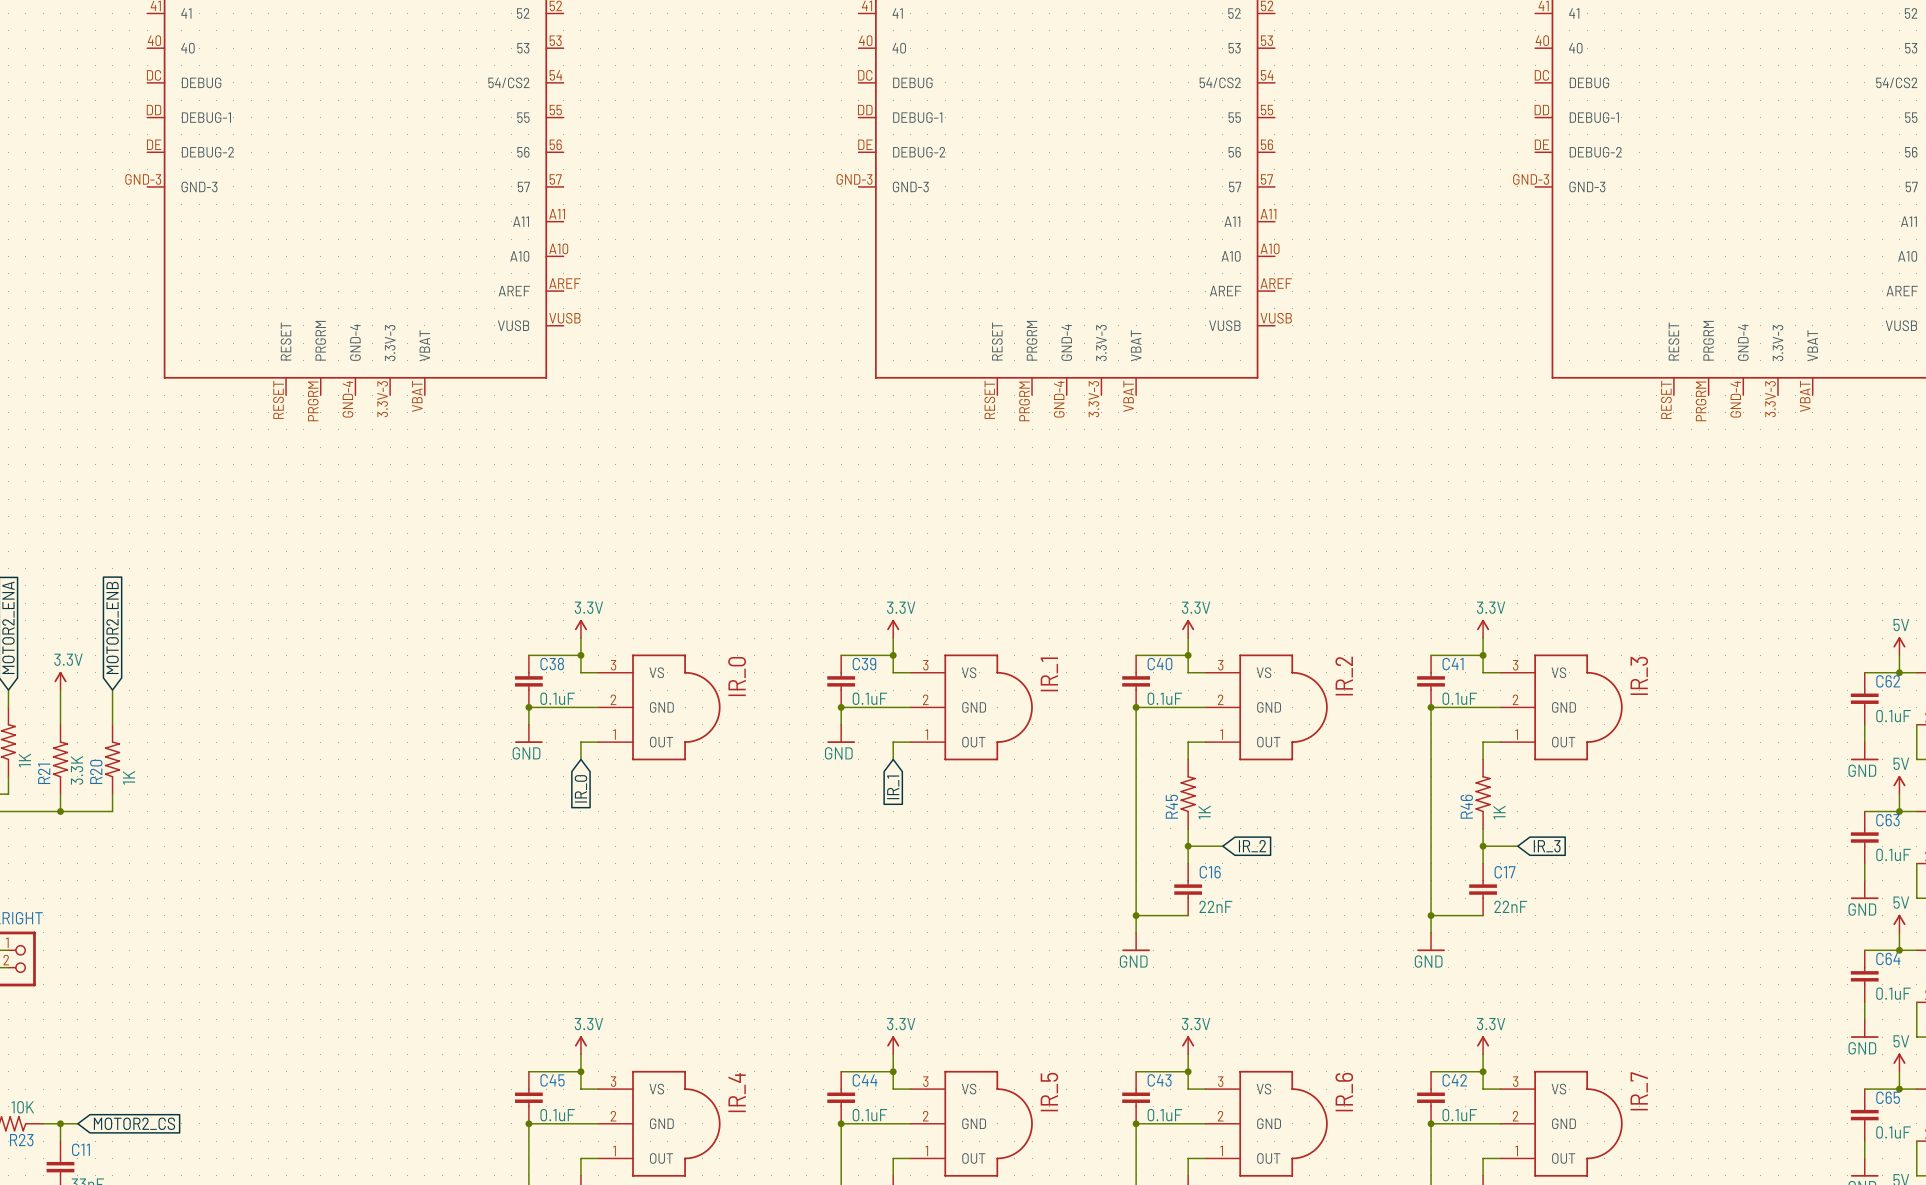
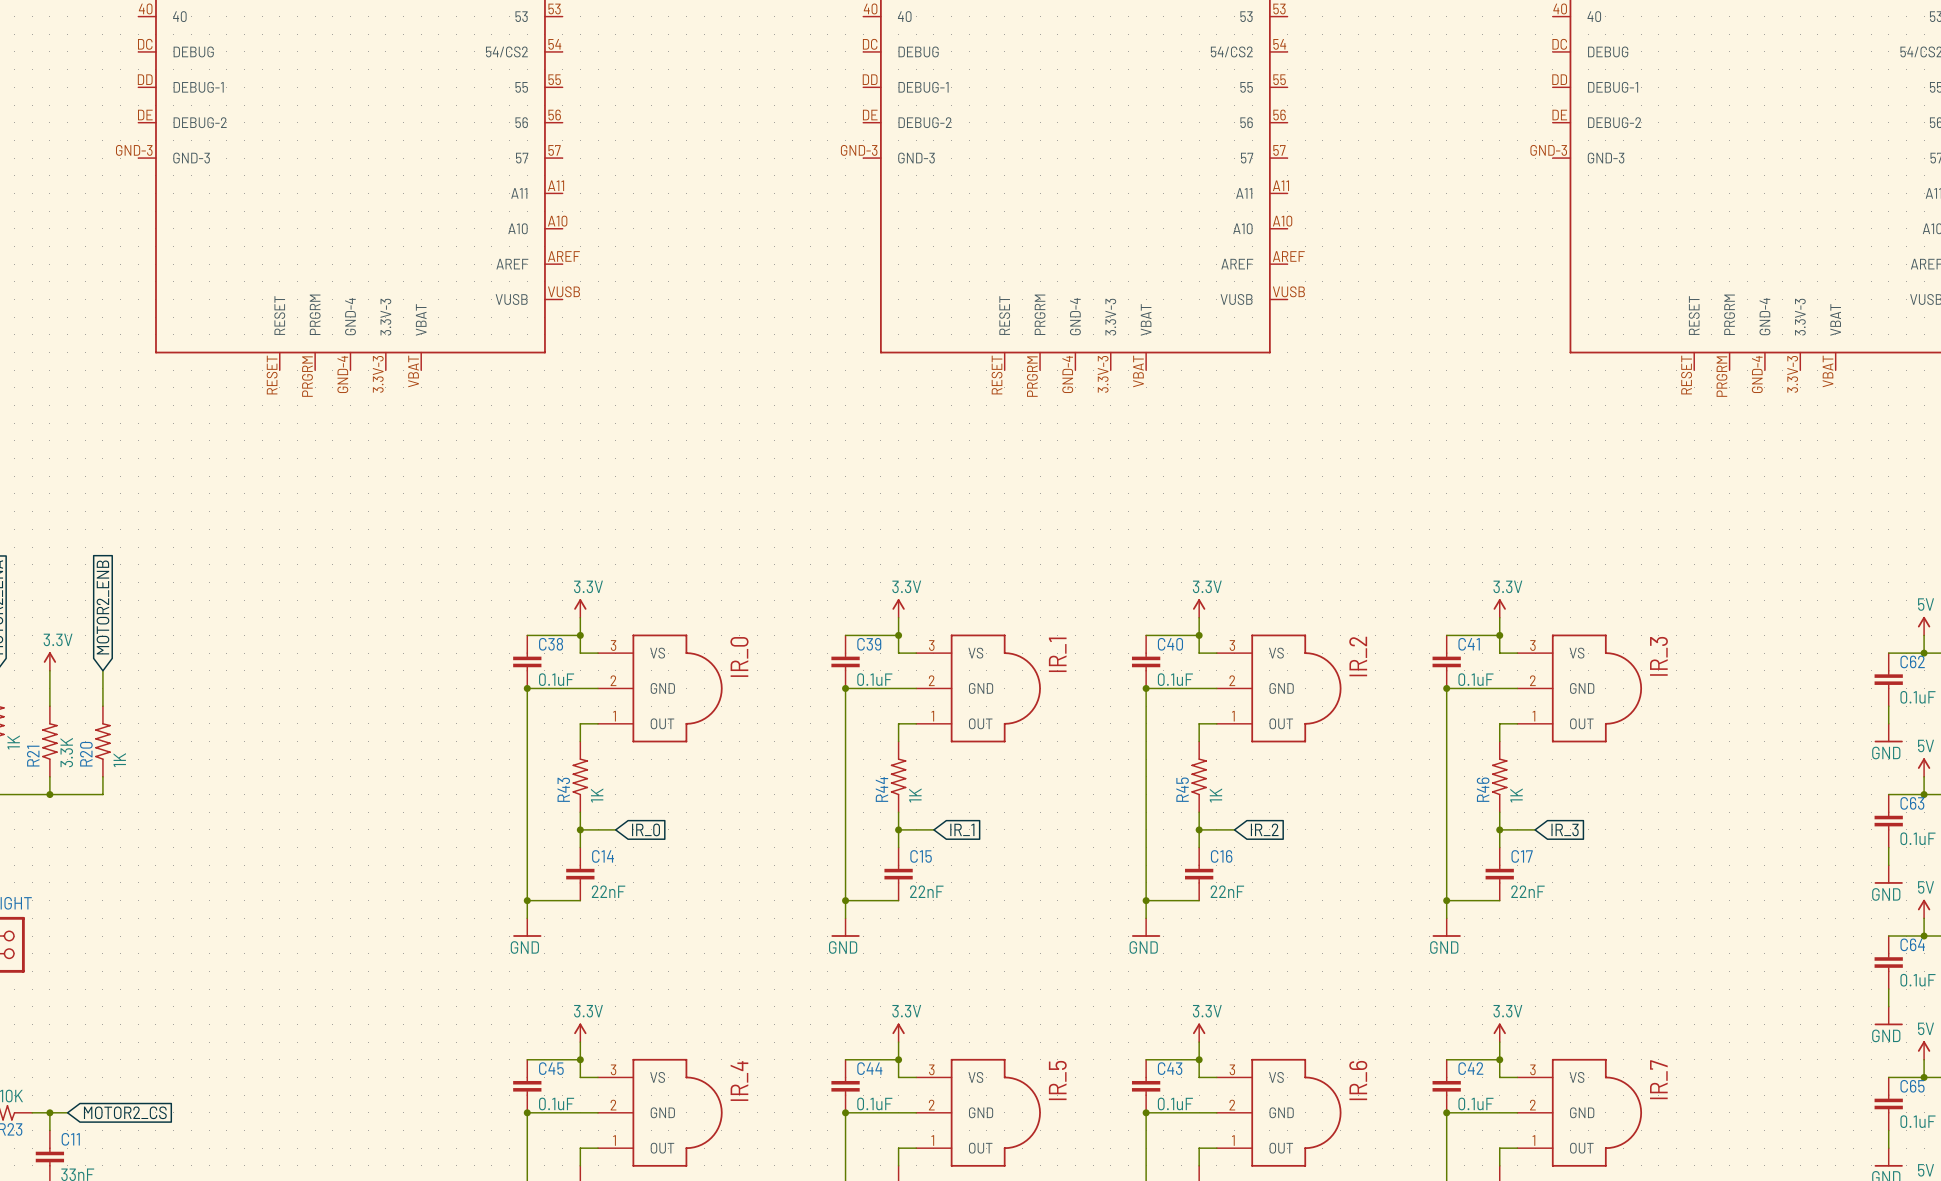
wire: none -> (527, 706) (527, 918)
wire: none -> (845, 706) (845, 918)
power symbol: GND (528, 733) -> none
power symbol: GND (841, 733) -> none
global label rotation: 0° (893, 787) -> 90° counterclockwise (962, 829)
global label position: IR_1 (893, 787) -> IR_1 (962, 829)
global label rotation: 0° (580, 788) -> 90° counterclockwise (646, 829)
global label position: IR_0 (580, 788) -> IR_0 (646, 829)
R43: none -> 1K (580, 776)
R44: none -> 1K (898, 776)
wire: none -> (580, 812) (580, 847)
wire: none -> (898, 812) (898, 847)
wire: none -> (580, 829) (615, 829)
junction: none -> (580, 829)
wire: none -> (898, 829) (933, 829)
junction: none -> (898, 829)
C14: none -> 22nF (580, 874)
C15: none -> 22nF (898, 874)
wire: none -> (527, 900) (580, 900)
junction: none -> (527, 900)
wire: none -> (845, 900) (898, 900)
junction: none -> (845, 900)
power symbol: none -> GND (527, 927)
power symbol: none -> GND (845, 927)

